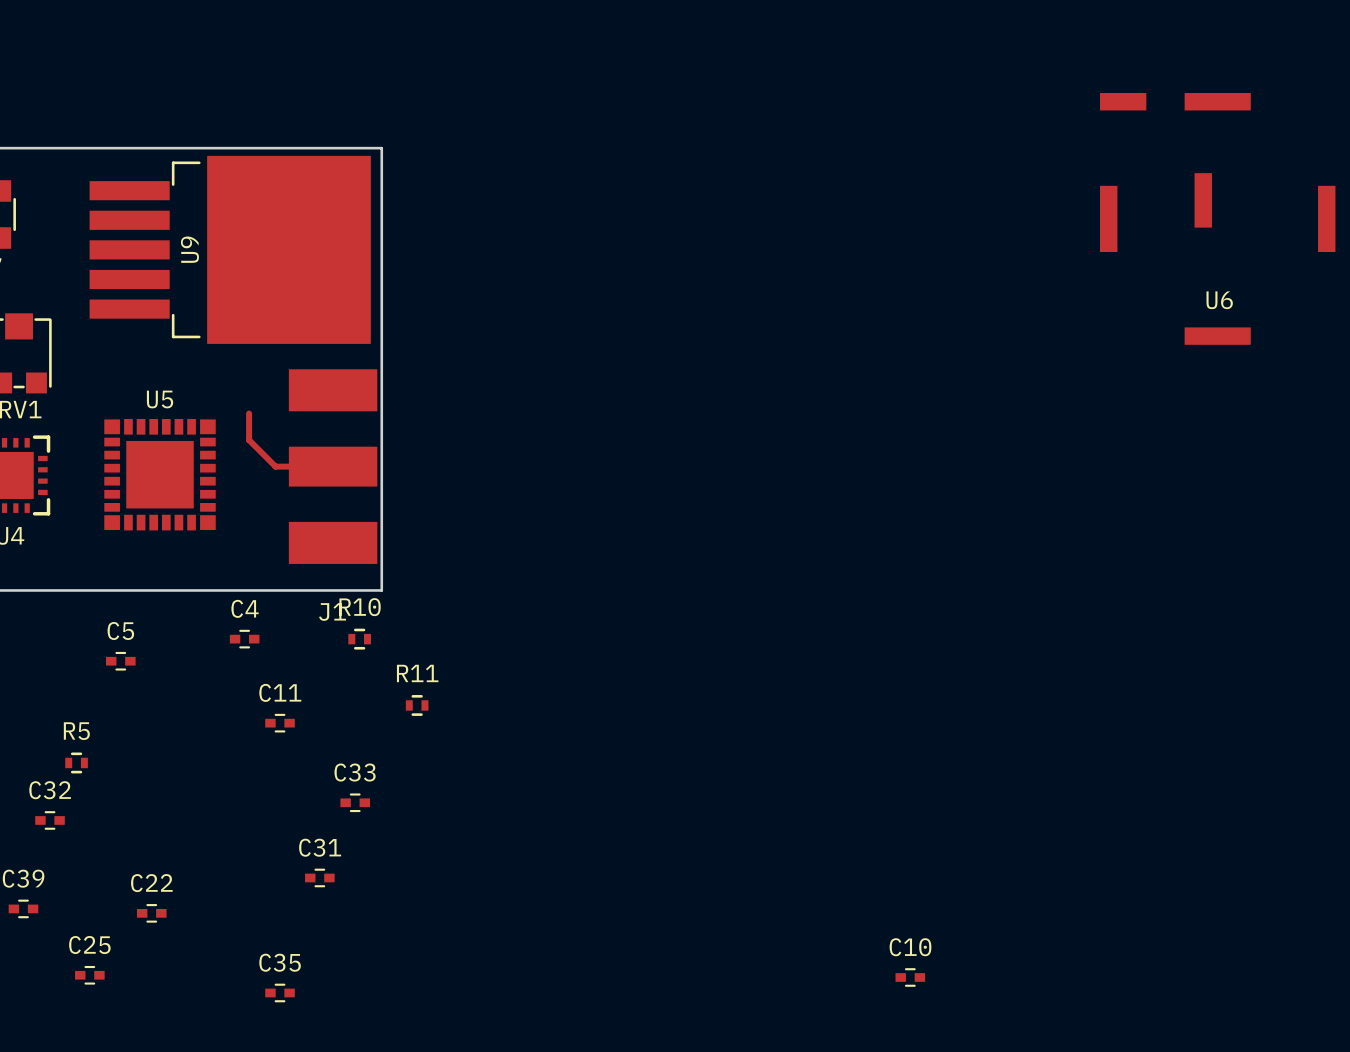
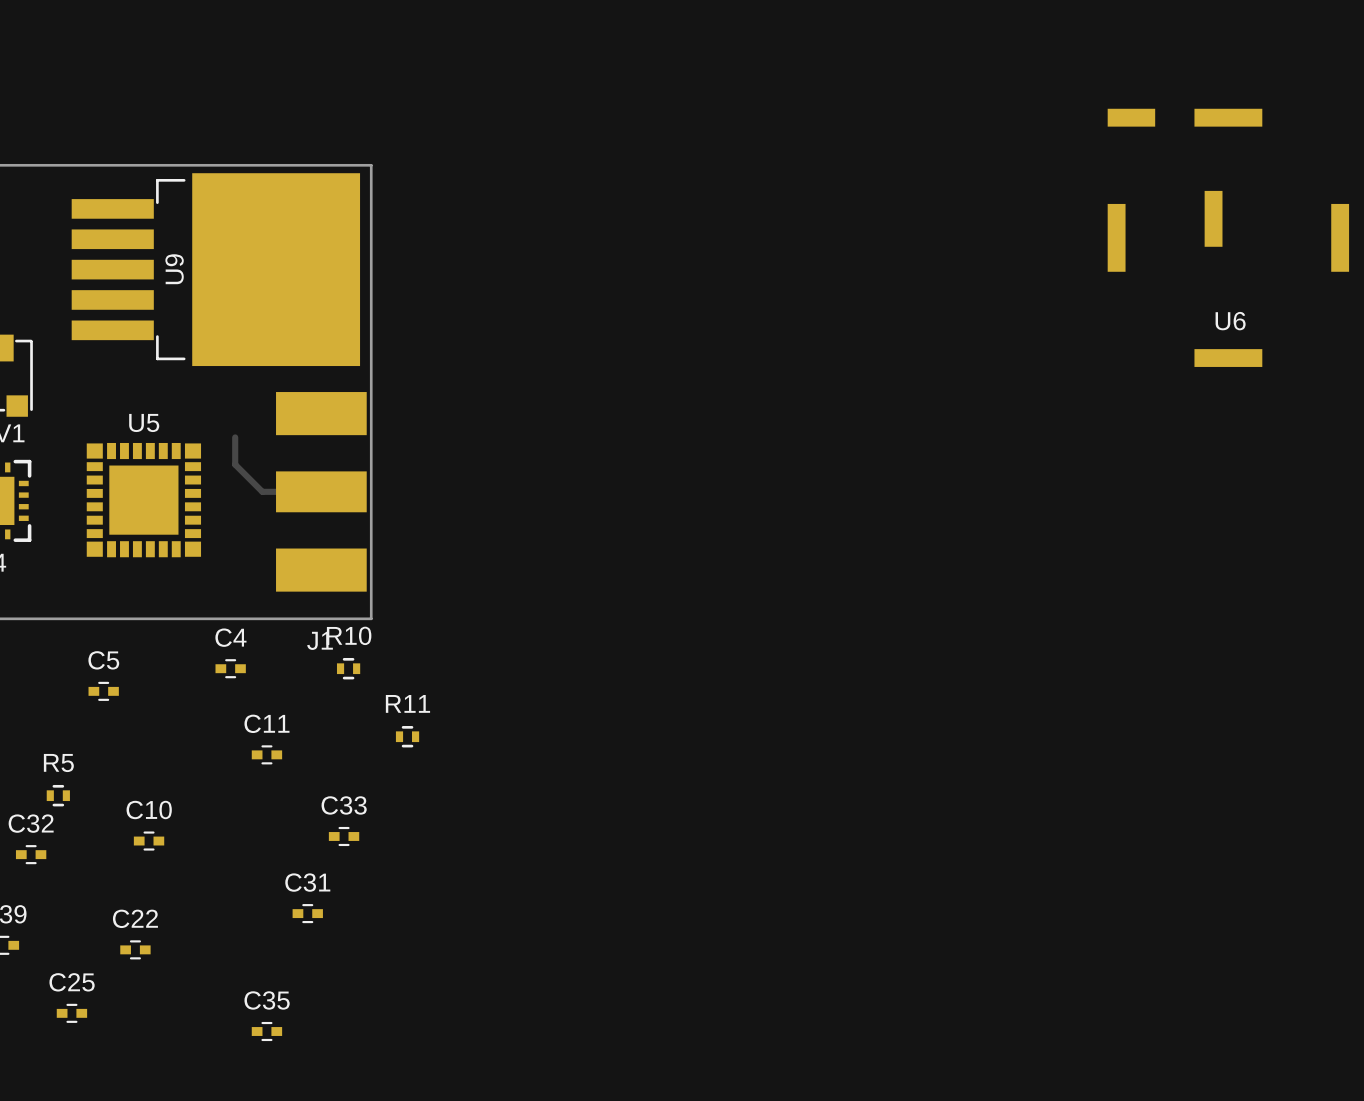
C10 position: (910, 977) -> (149, 841)

